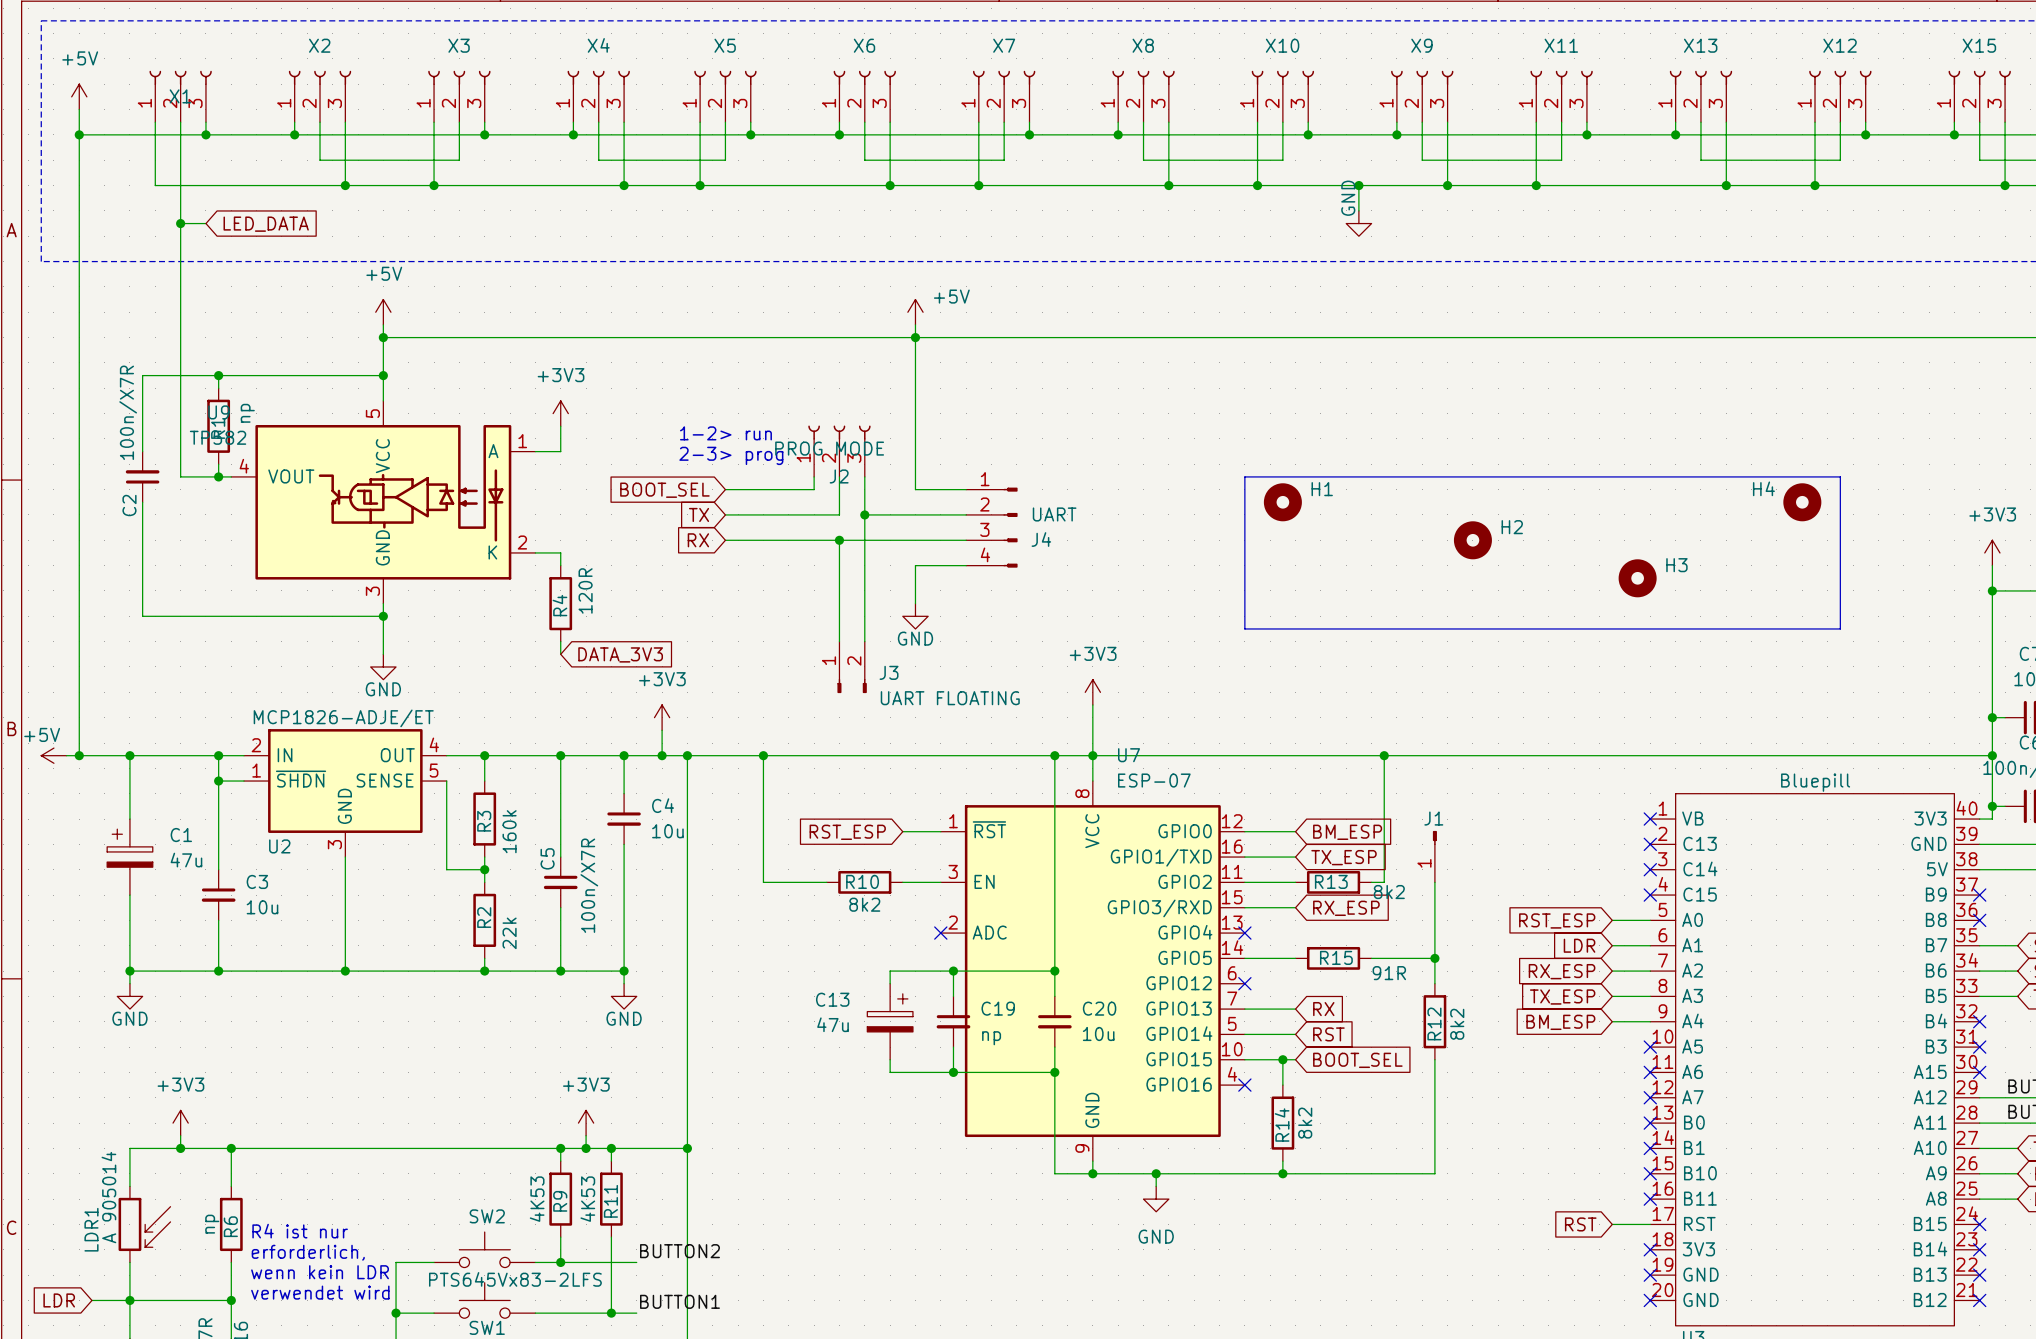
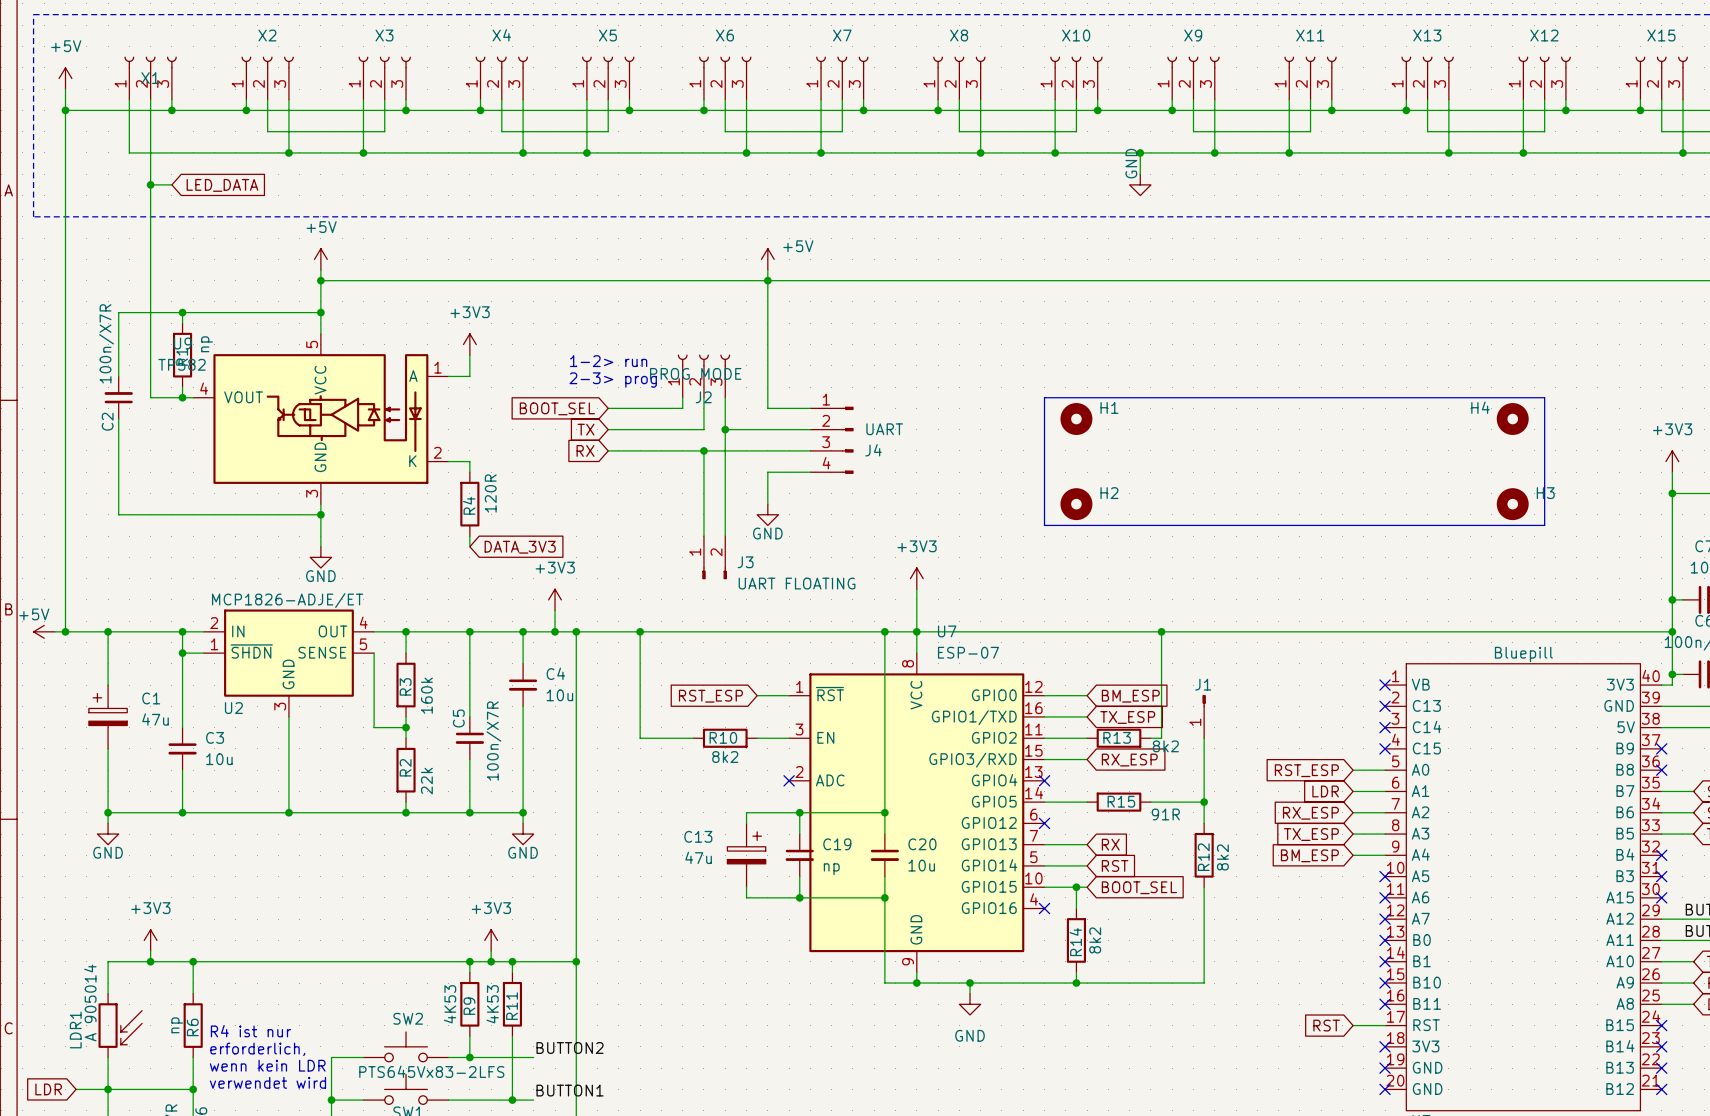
H2 position: (1472, 540) -> (1076, 504)
H3 position: (1637, 578) -> (1512, 504)

